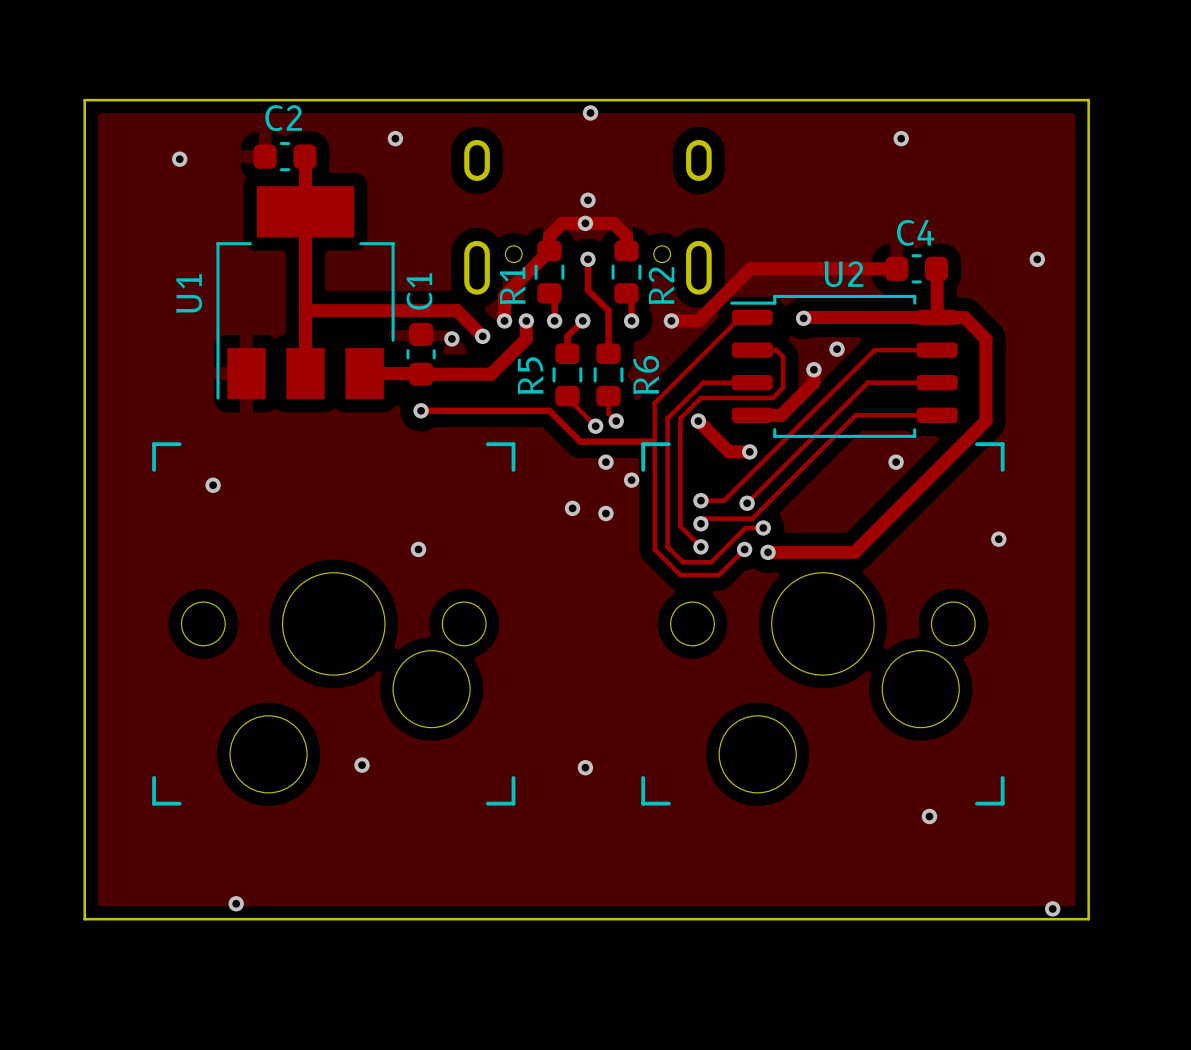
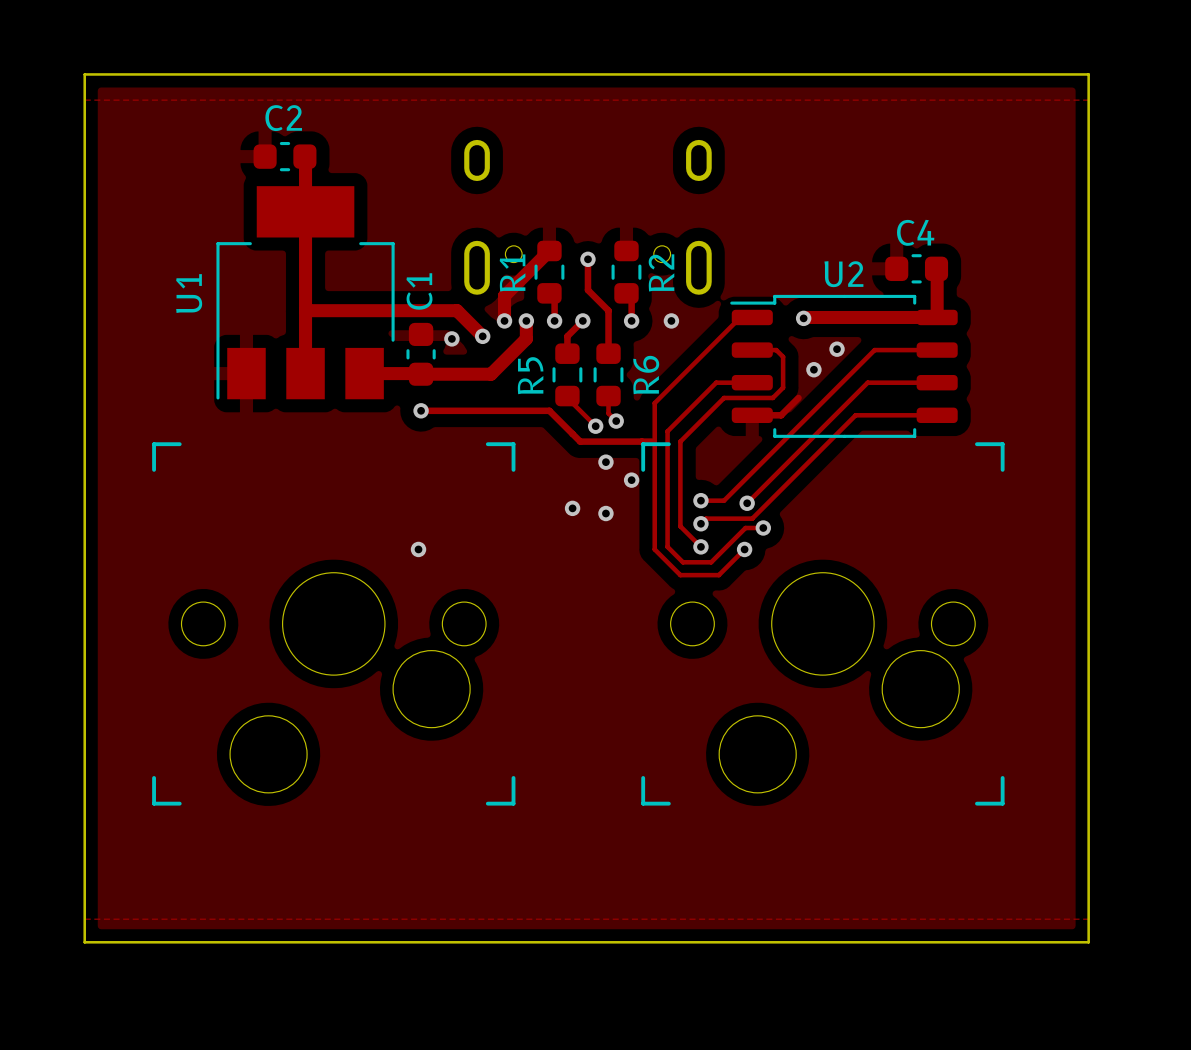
board edge: (84, 100) (1088, 100) -> (84, 100) (84, 74) (1088, 74) (1088, 100)
via: (590, 112) -> none
via: (395, 138) -> none
via: (901, 138) -> none
via: (179, 159) -> none
via: (587, 200) -> none
via: (585, 223) -> none
track: (549, 250) (549, 236) (562, 223) (613, 223) (626, 236) (626, 250) -> none
via: (1037, 259) -> none
track: (896, 268) (750, 268) (698, 320) (671, 320) -> none
R1 name position: R1 (512, 285) -> R1 (512, 272)
R2 name position: R2 (661, 285) -> R2 (661, 272)
track: (937, 317) (964, 317) (985, 338) (985, 421) (854, 552) (768, 552) -> none
track: (813, 369) (813, 382) (798, 397) -> none
track: (716, 382) (703, 382) (667, 418) (667, 431) -> none
track: (700, 397) (724, 397) -> (700, 397) (716, 382)
track: none -> (724, 397) (680, 441)
track width: thick (798, 397) (781, 415) (752, 415) -> thin (798, 397) (781, 415) (752, 415)
track: (680, 418) (680, 441) -> (680, 418) (667, 431)
track: (698, 421) (729, 451) (749, 451) -> none
via: (698, 421) -> none
via: (749, 451) -> none
via: (896, 462) -> none
via: (213, 485) -> none
via: (998, 539) -> none
via: (768, 552) -> none
via: (362, 765) -> none
via: (585, 767) -> none
via: (929, 816) -> none
via: (236, 903) -> none
via: (1052, 908) -> none
board edge: (84, 919) (1088, 919) -> (84, 919) (84, 942) (1088, 942) (1088, 919)

